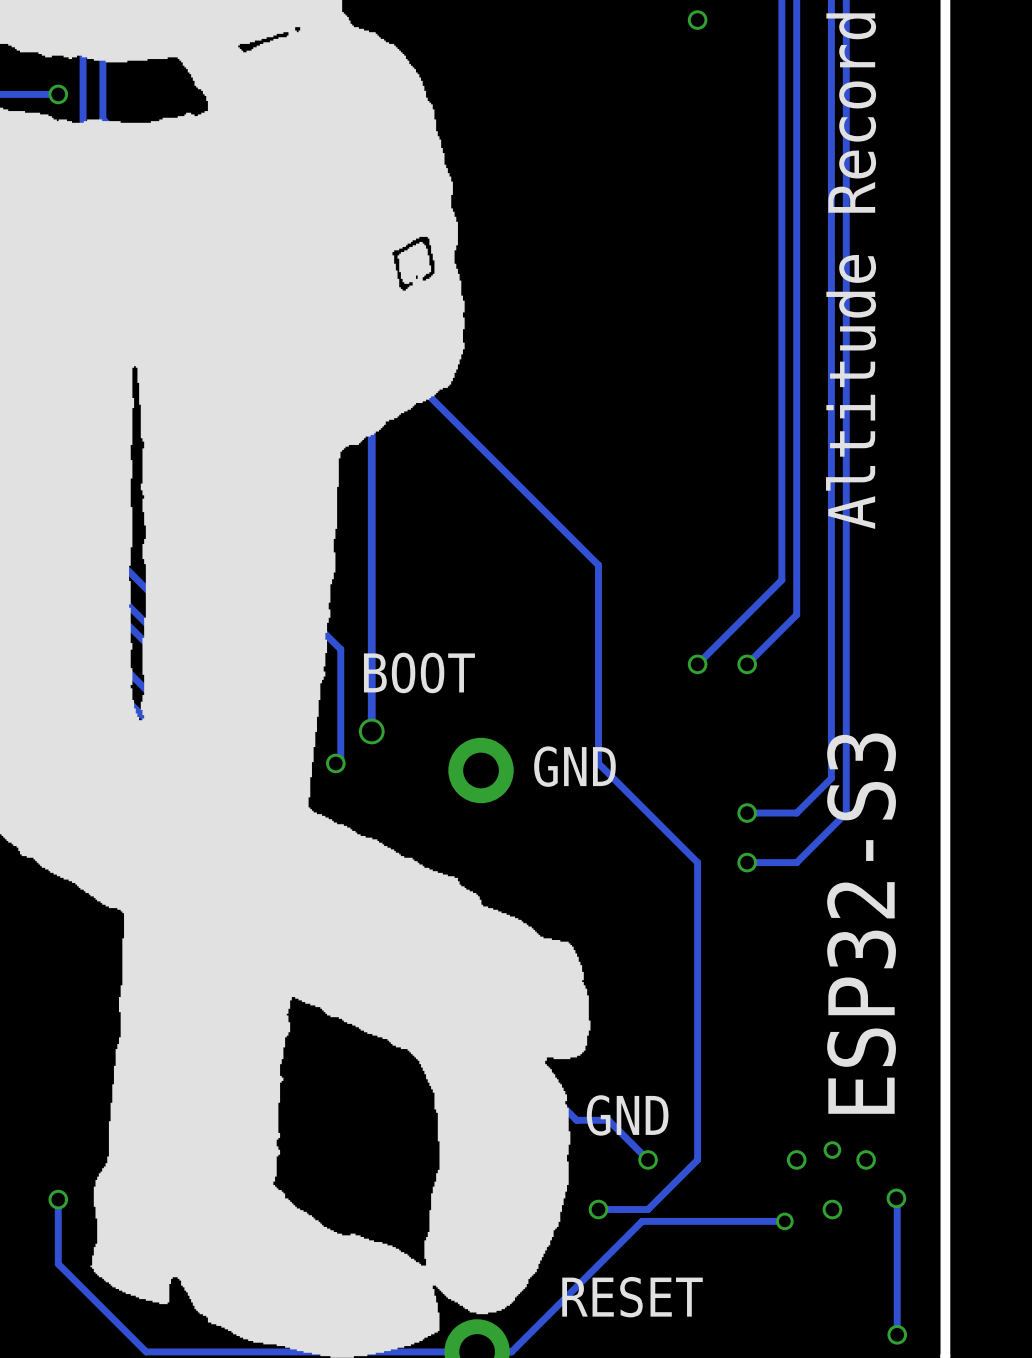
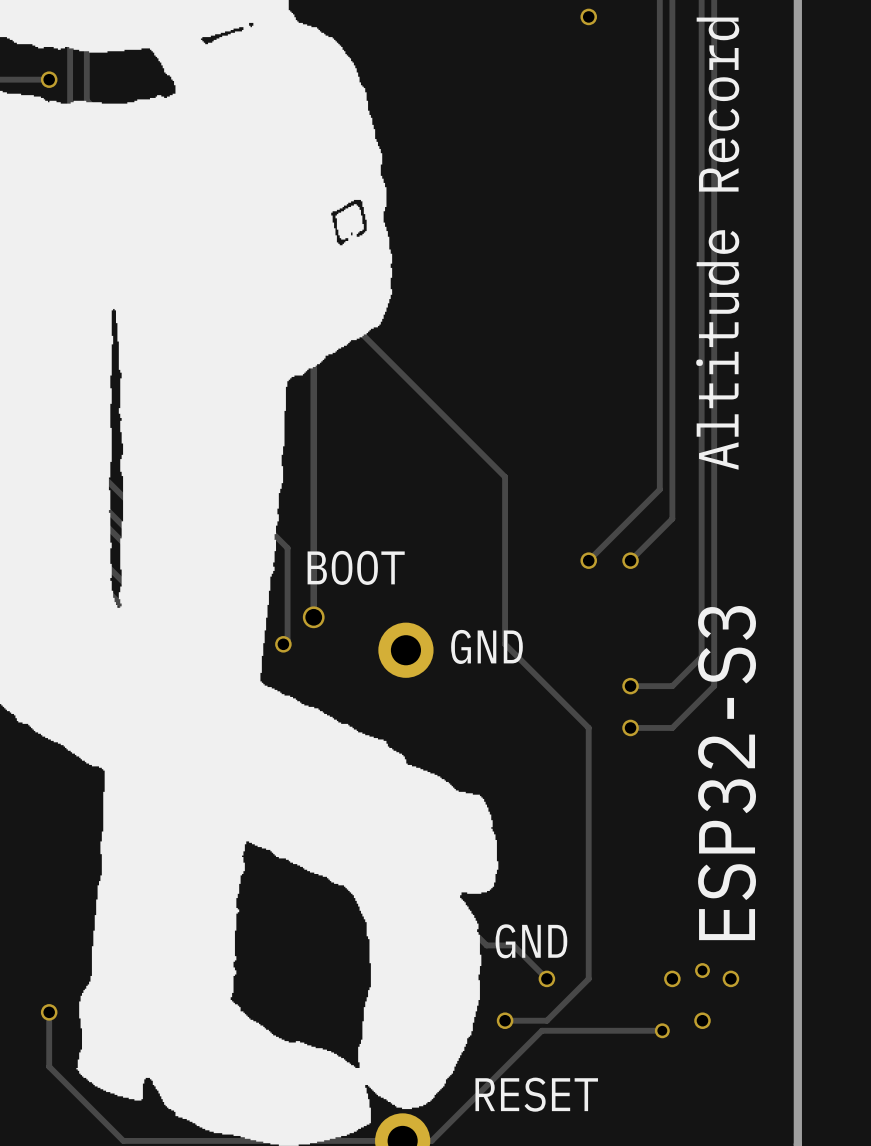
track: (896, 1198) (897, 1334) -> none
via: (896, 1198) -> none
via: (897, 1334) -> none

